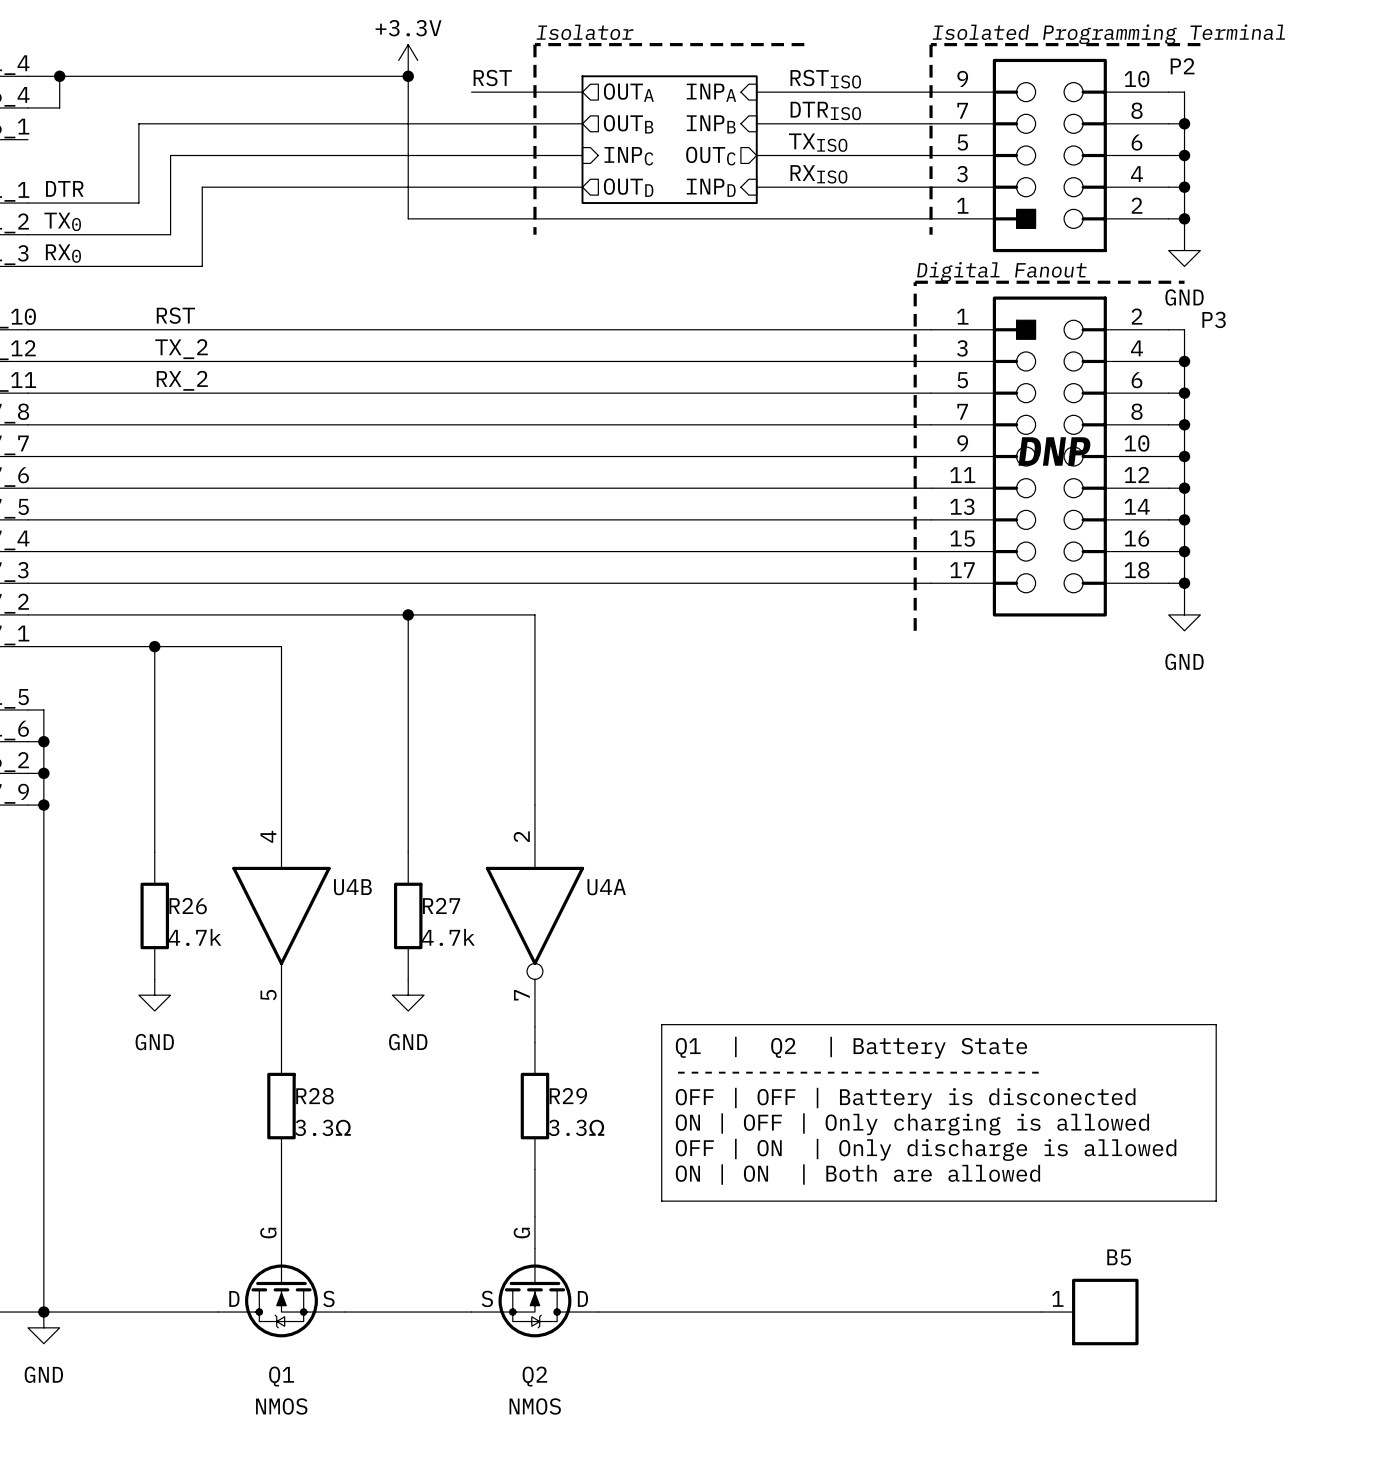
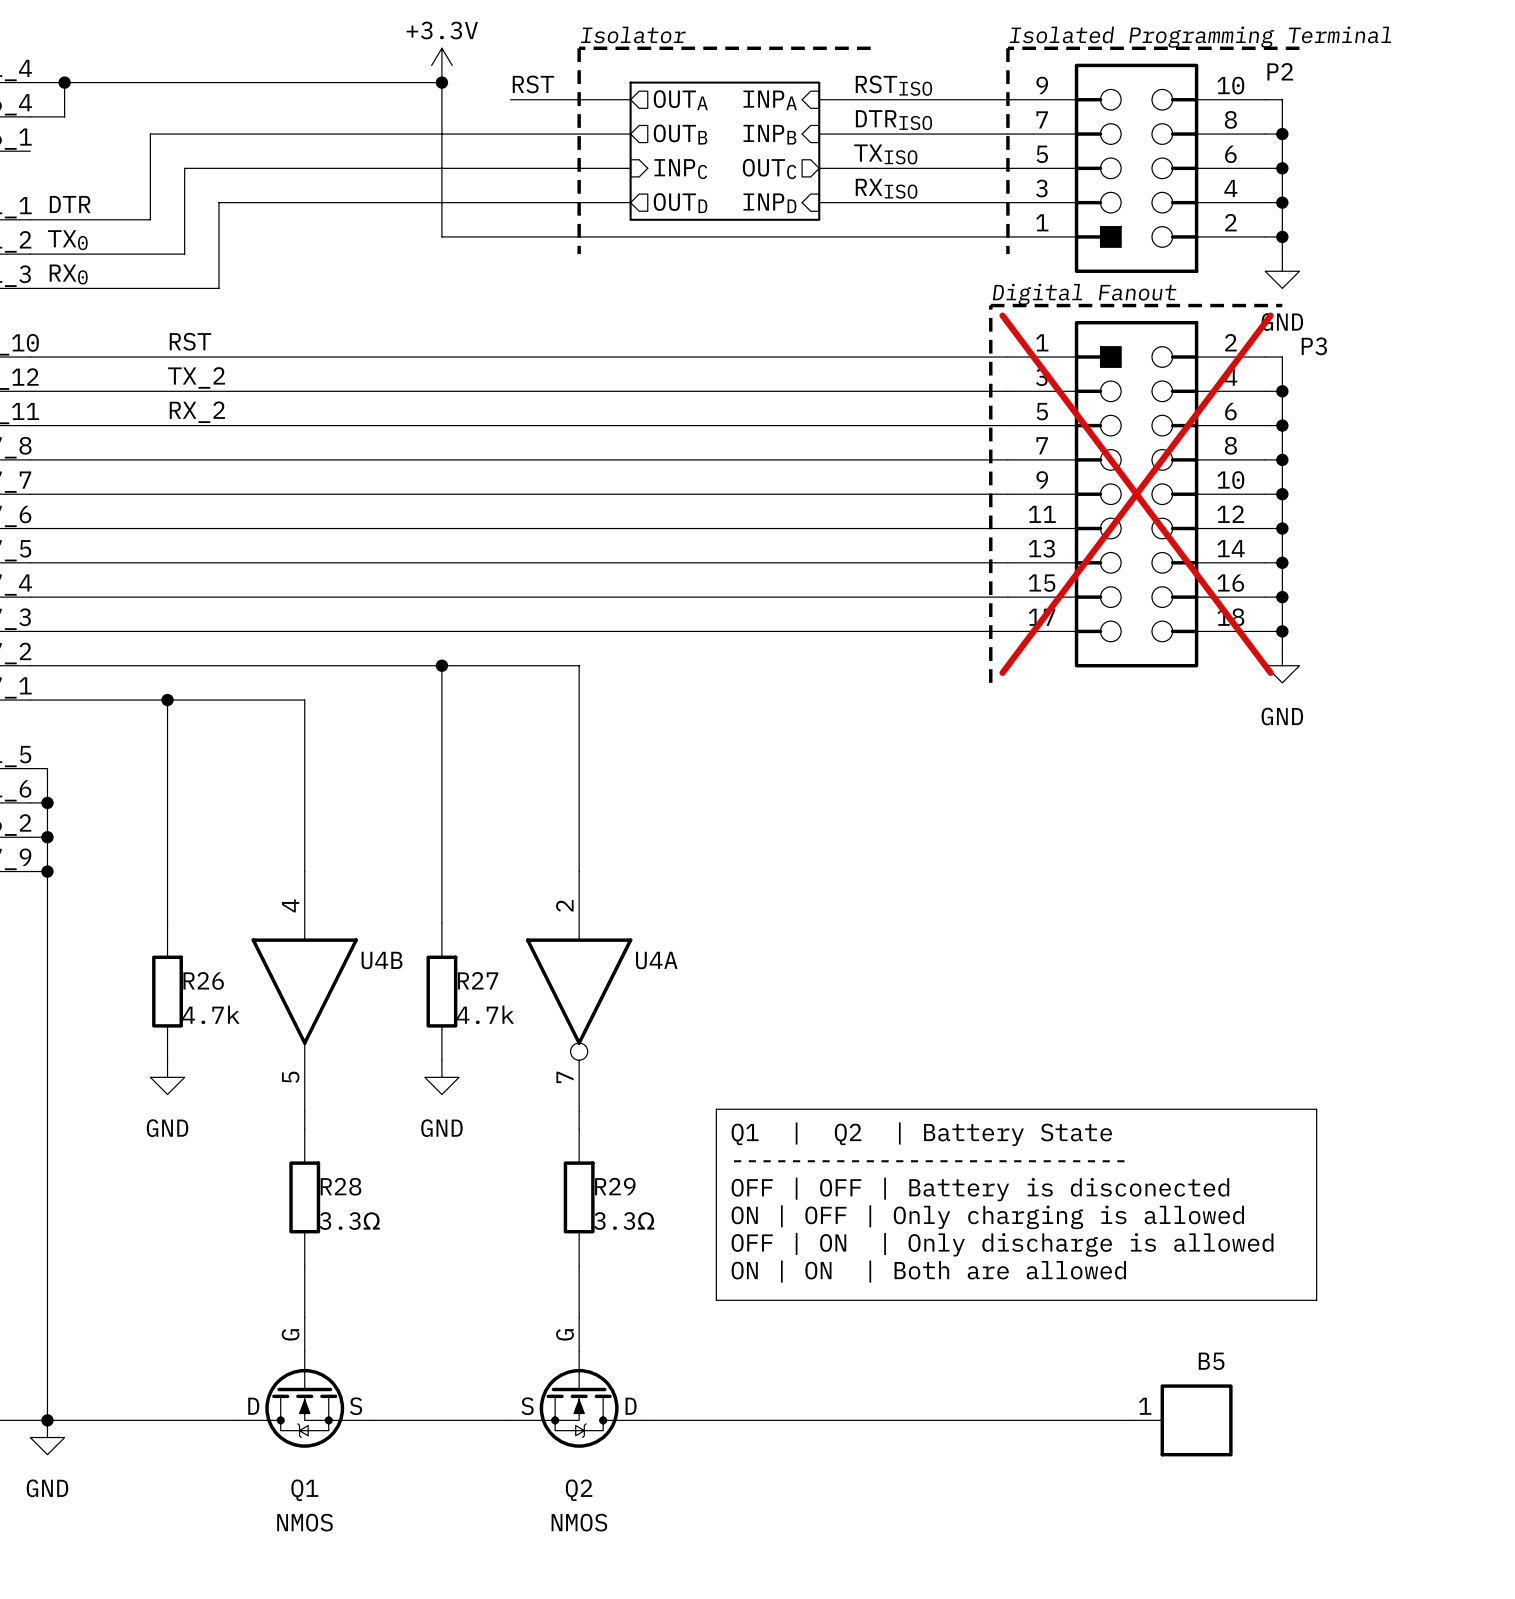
text: DNP (1054, 451) -> none
P3 do-not-place cross: none -> (1136, 494)

